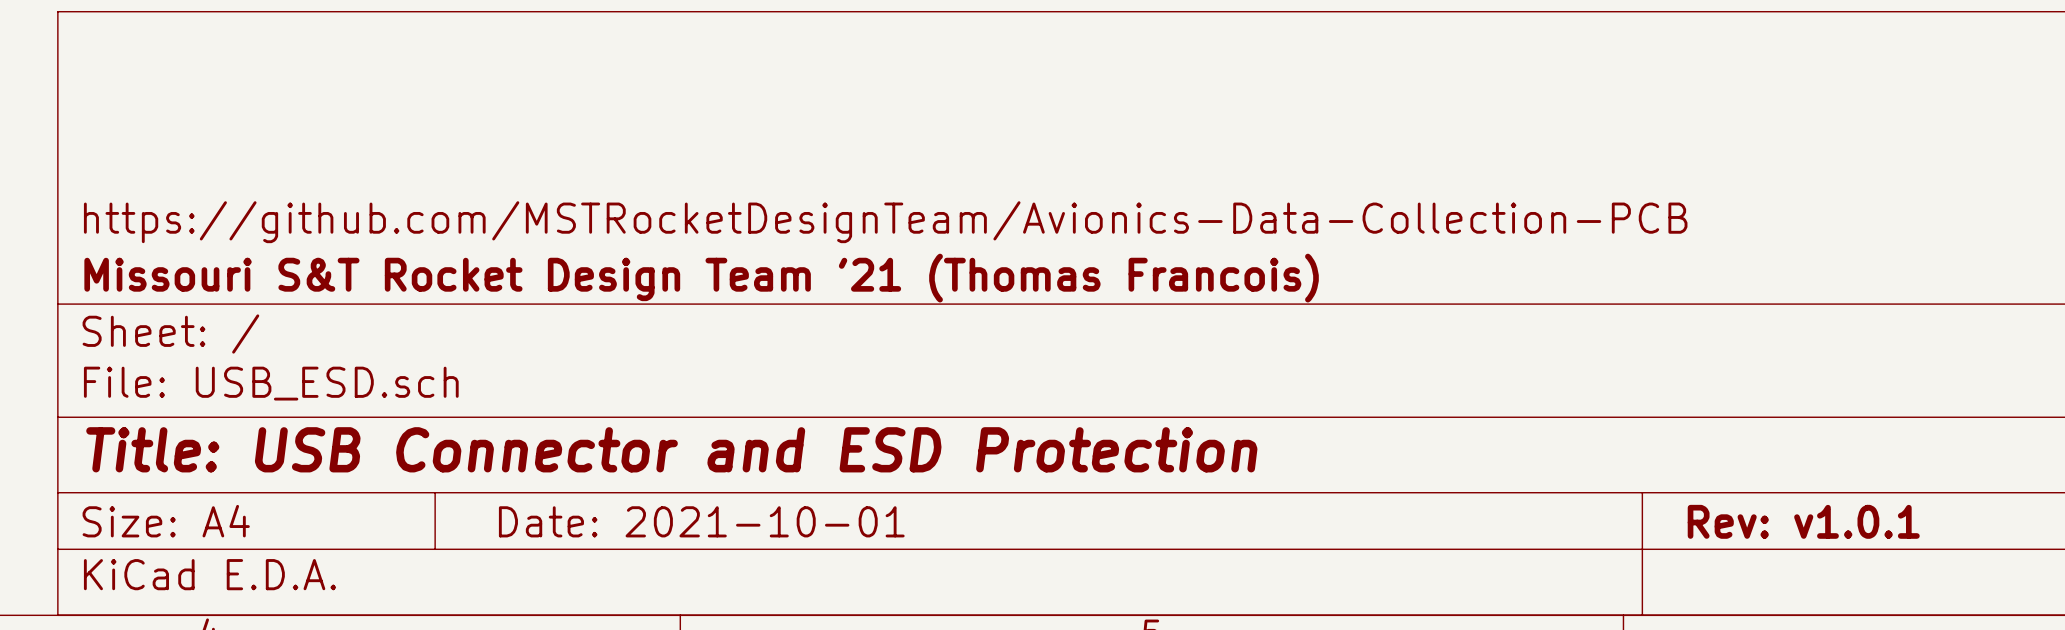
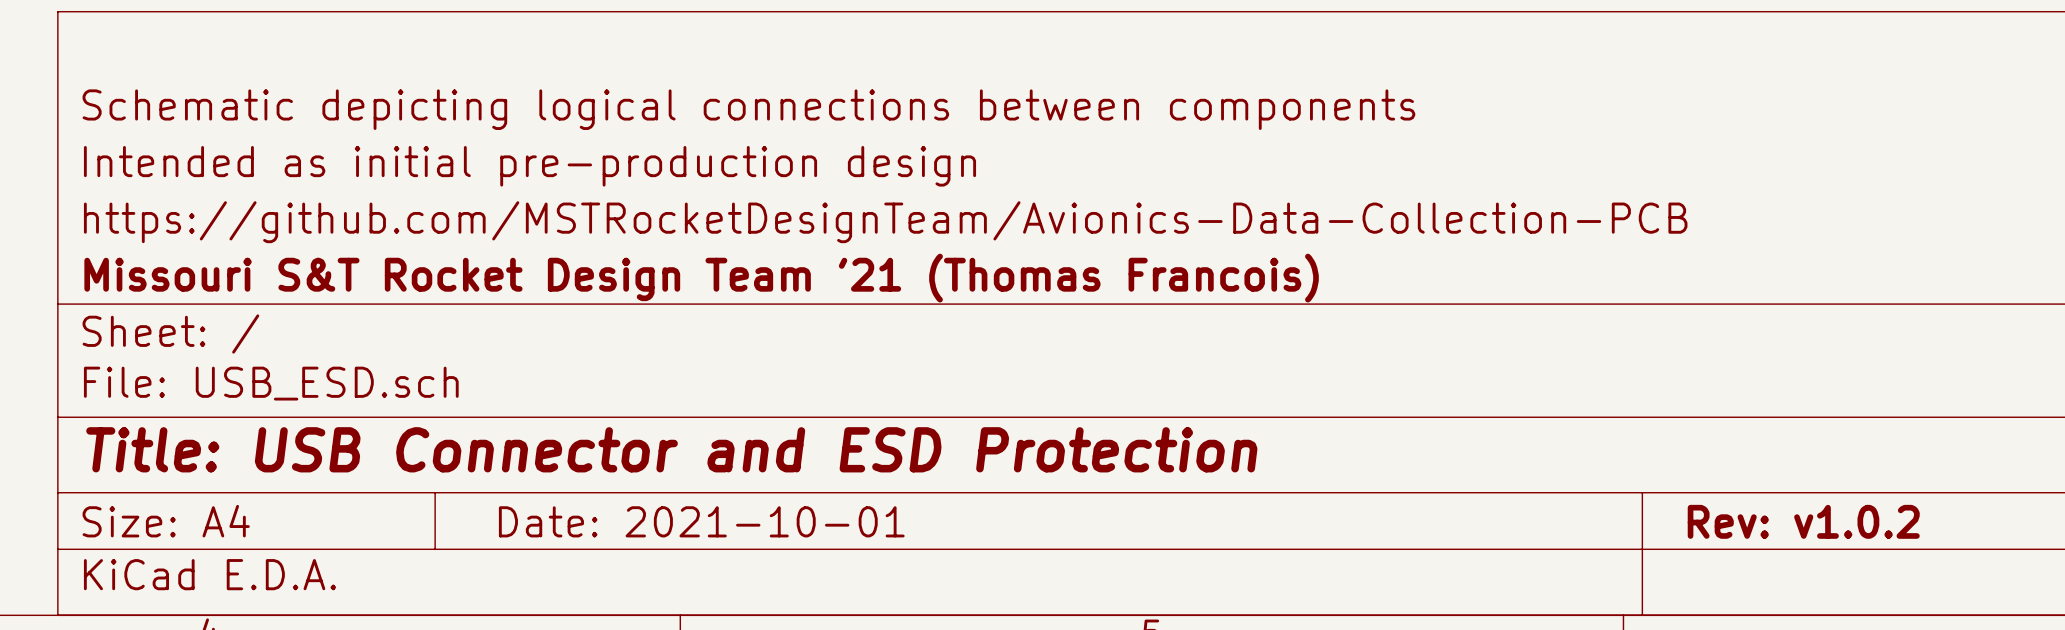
title block: none -> Schematic depicting logical connections between components (748, 109)
title block: none -> Intended as initial pre-production design (529, 166)
title block: Rev: v1.0.1 (1803, 521) -> Rev: v1.0.2 (1803, 521)

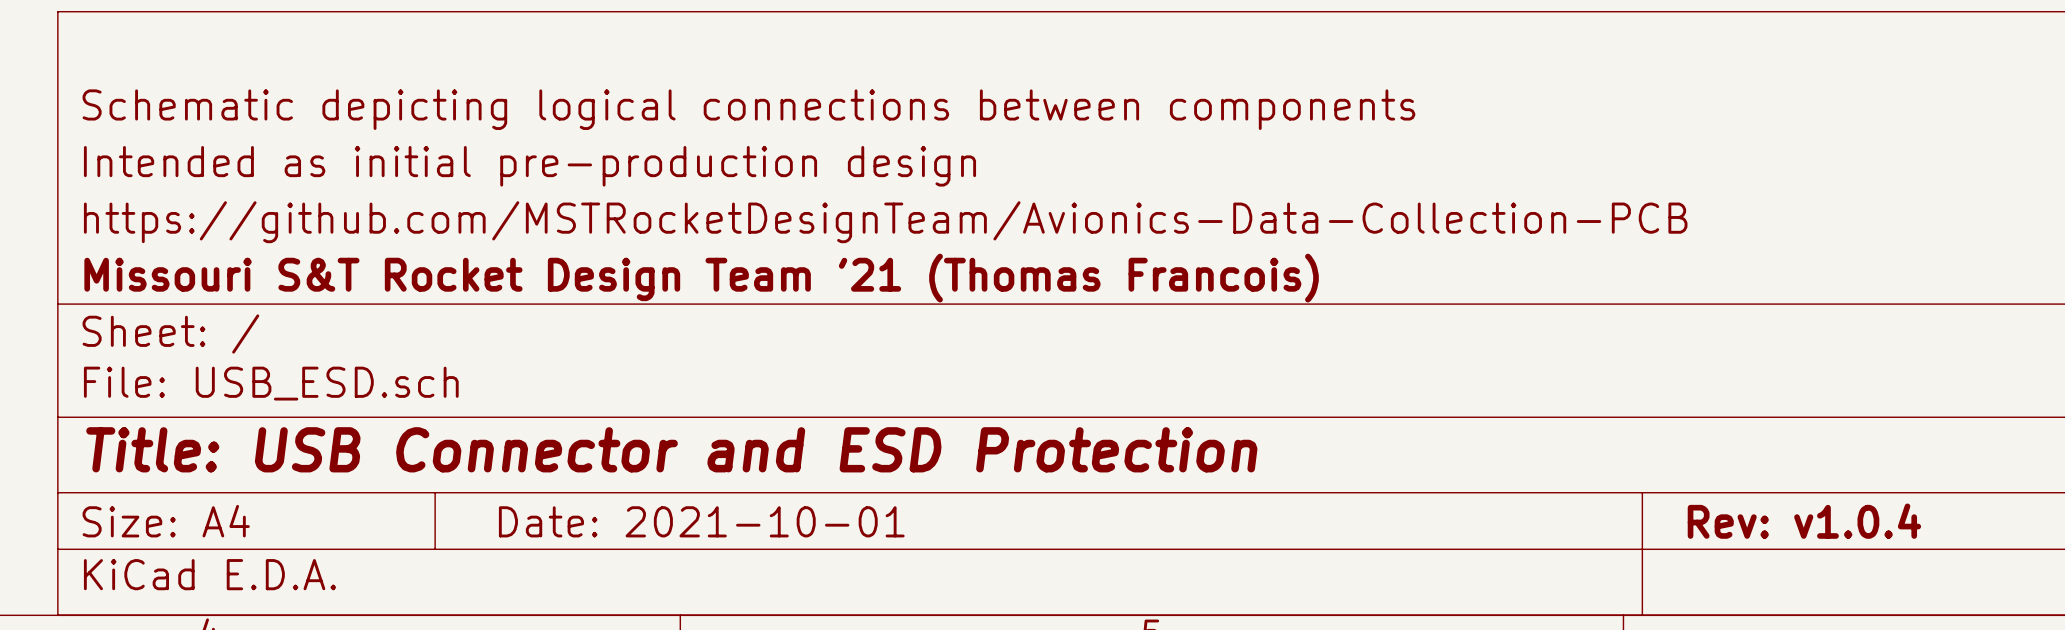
title block: Rev: v1.0.2 (1803, 521) -> Rev: v1.0.4 (1804, 521)

